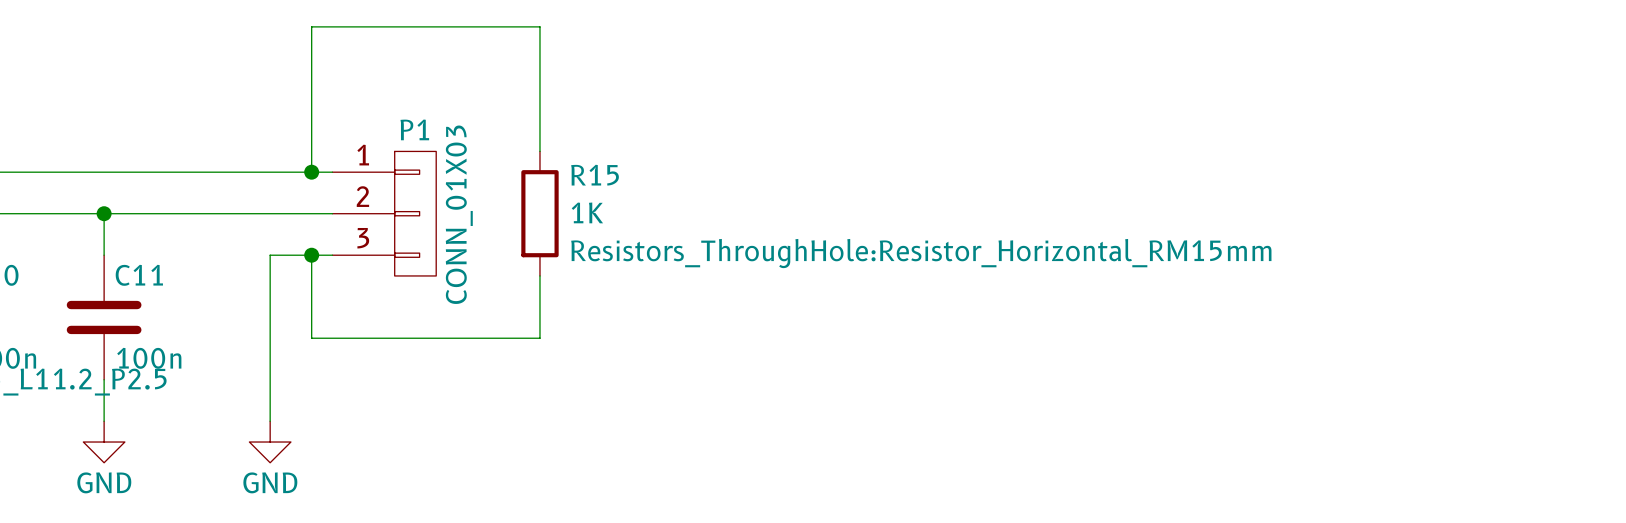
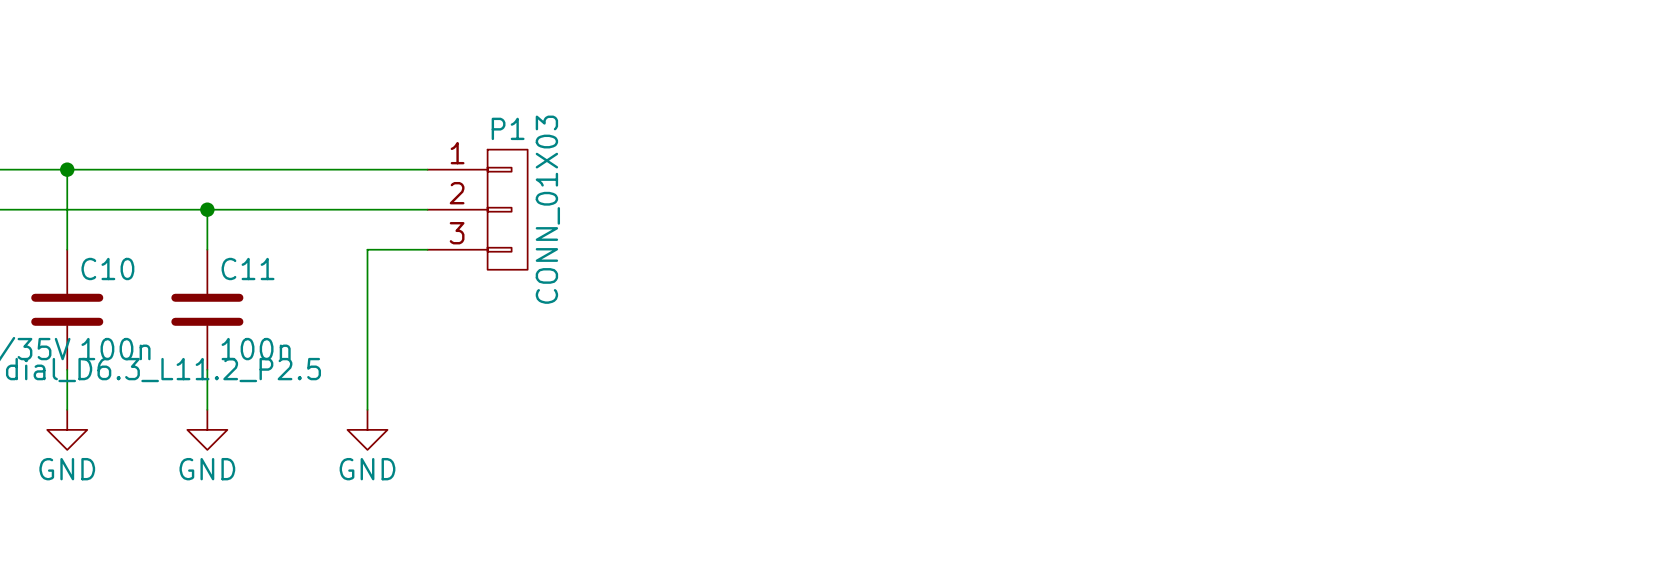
wire: (539, 151) (539, 26) (311, 26) (311, 172) -> none
junction: (311, 172) -> none
R15: 1K (539, 213) -> none
wire: (311, 255) (311, 338) (539, 338) (539, 275) -> none
junction: (311, 255) -> none

